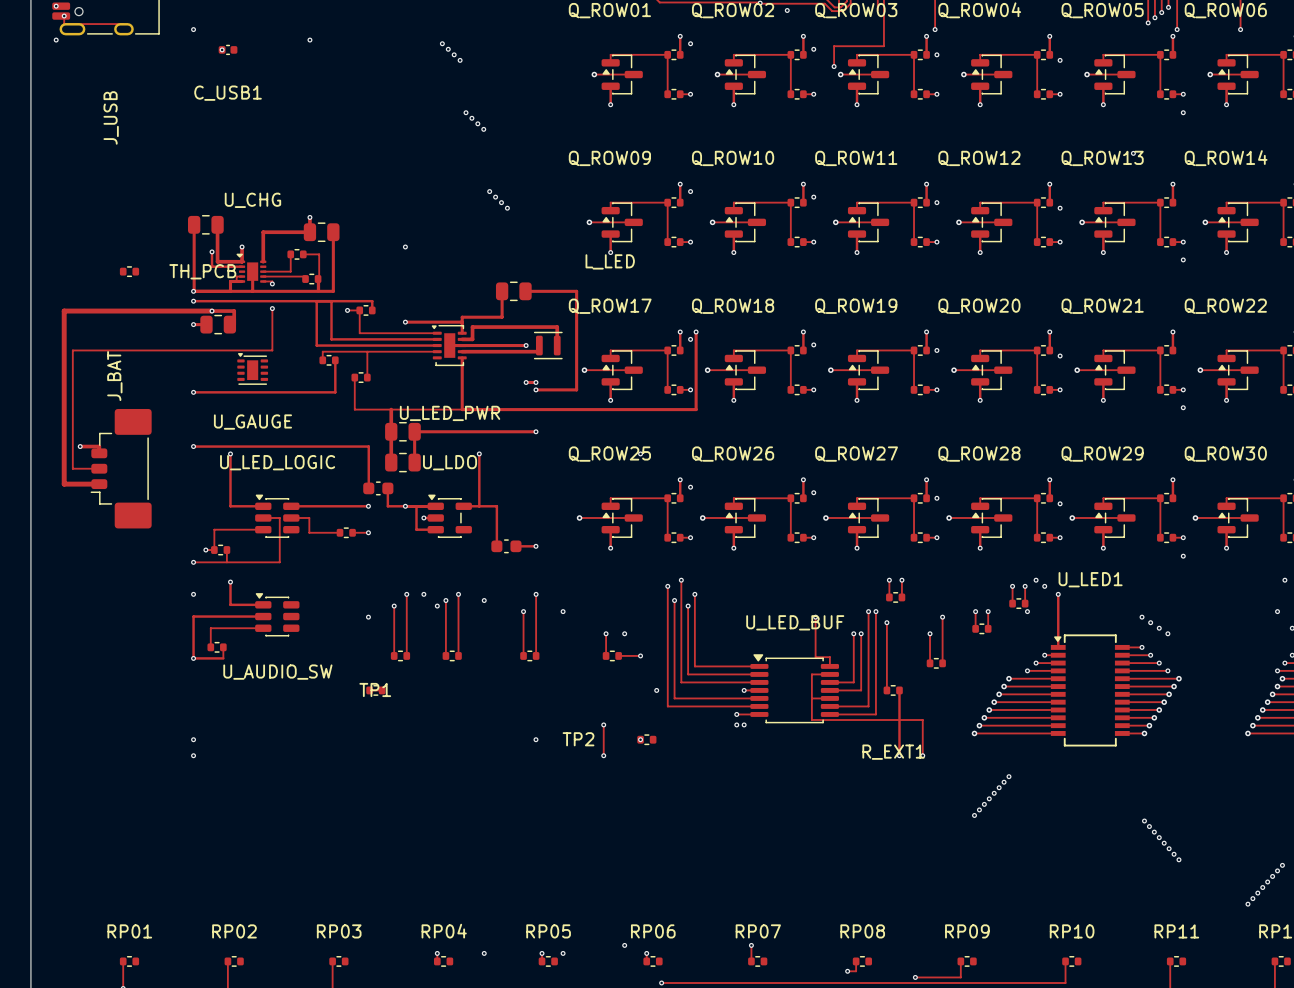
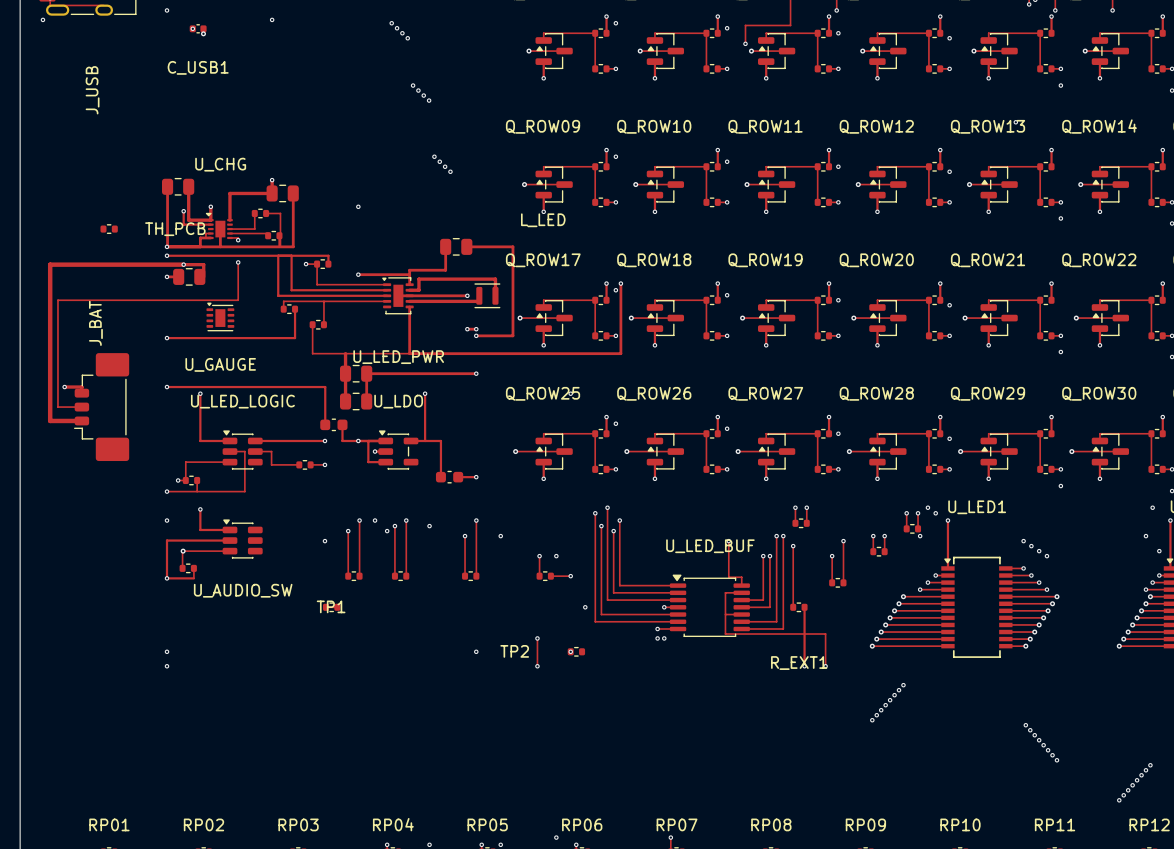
via: none -> (203, 33)
via: none -> (183, 551)

